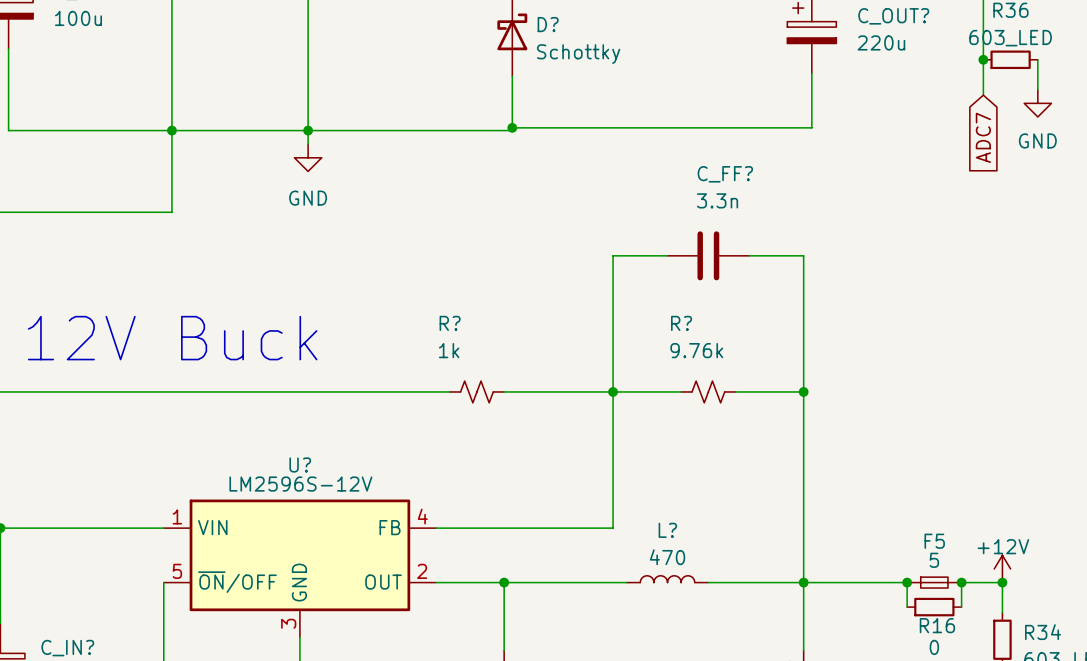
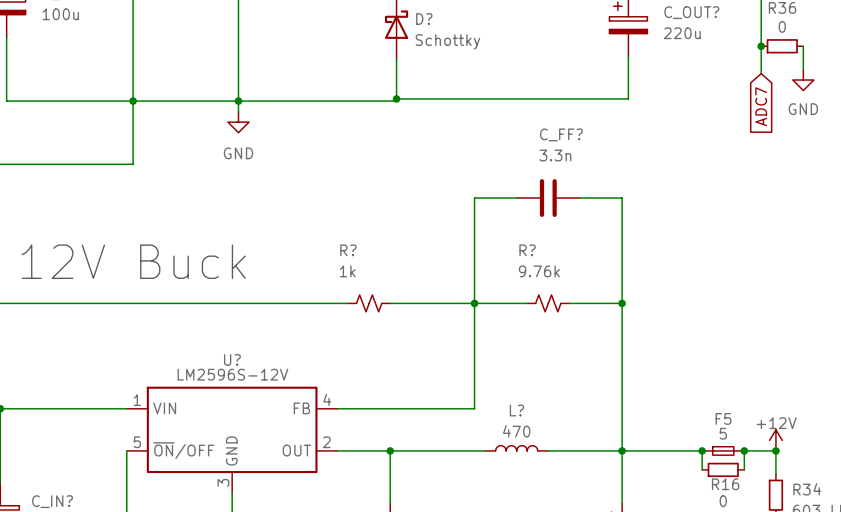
R36 value: 603_LED (1010, 38) -> 0 (782, 26)

